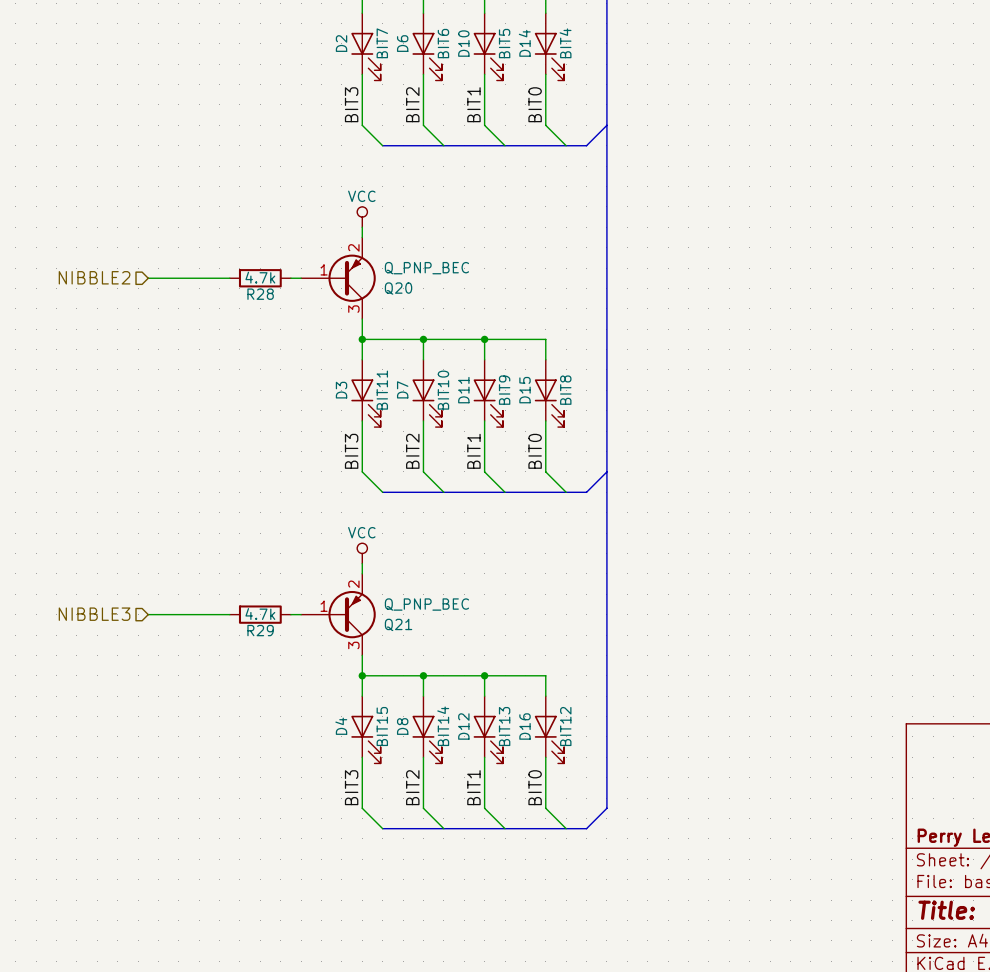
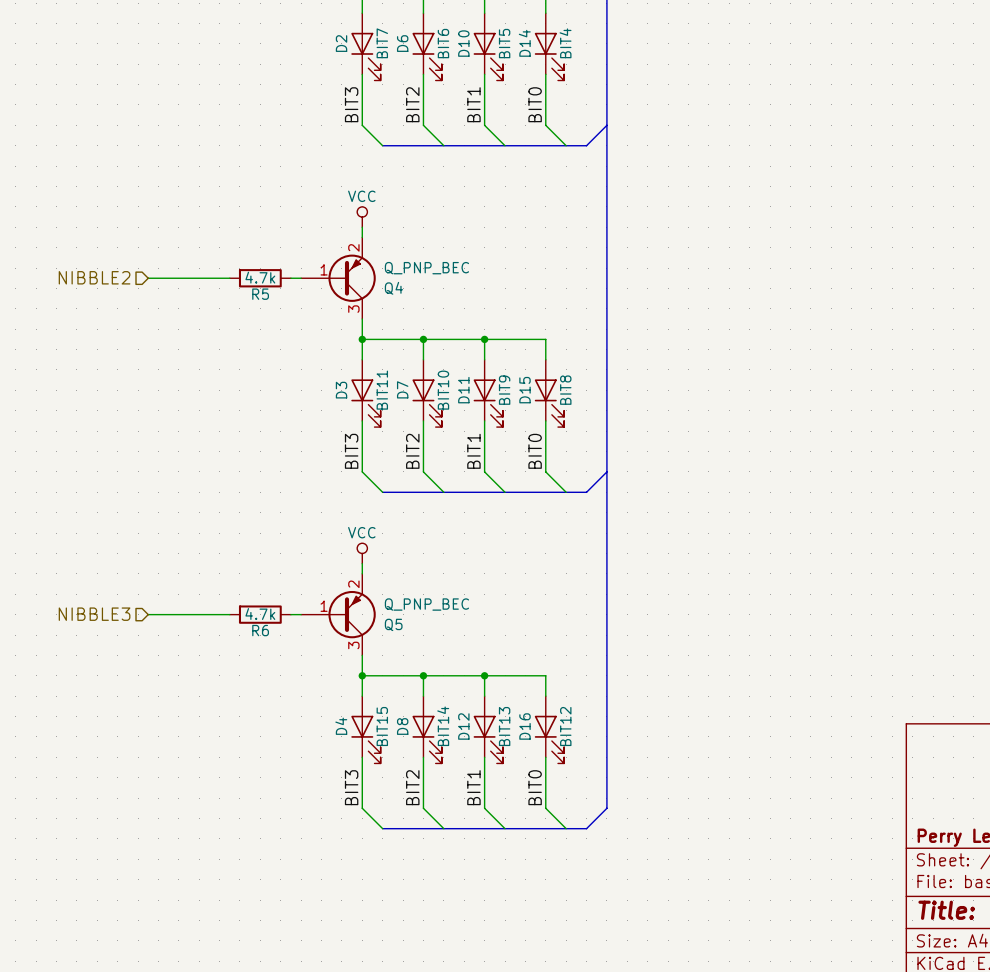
Q20 name: Q20 (398, 288) -> Q4 (393, 288)
R28 name: R28 (260, 294) -> R5 (260, 294)
Q21 name: Q21 (398, 624) -> Q5 (393, 624)
R29 name: R29 (260, 630) -> R6 (260, 630)

